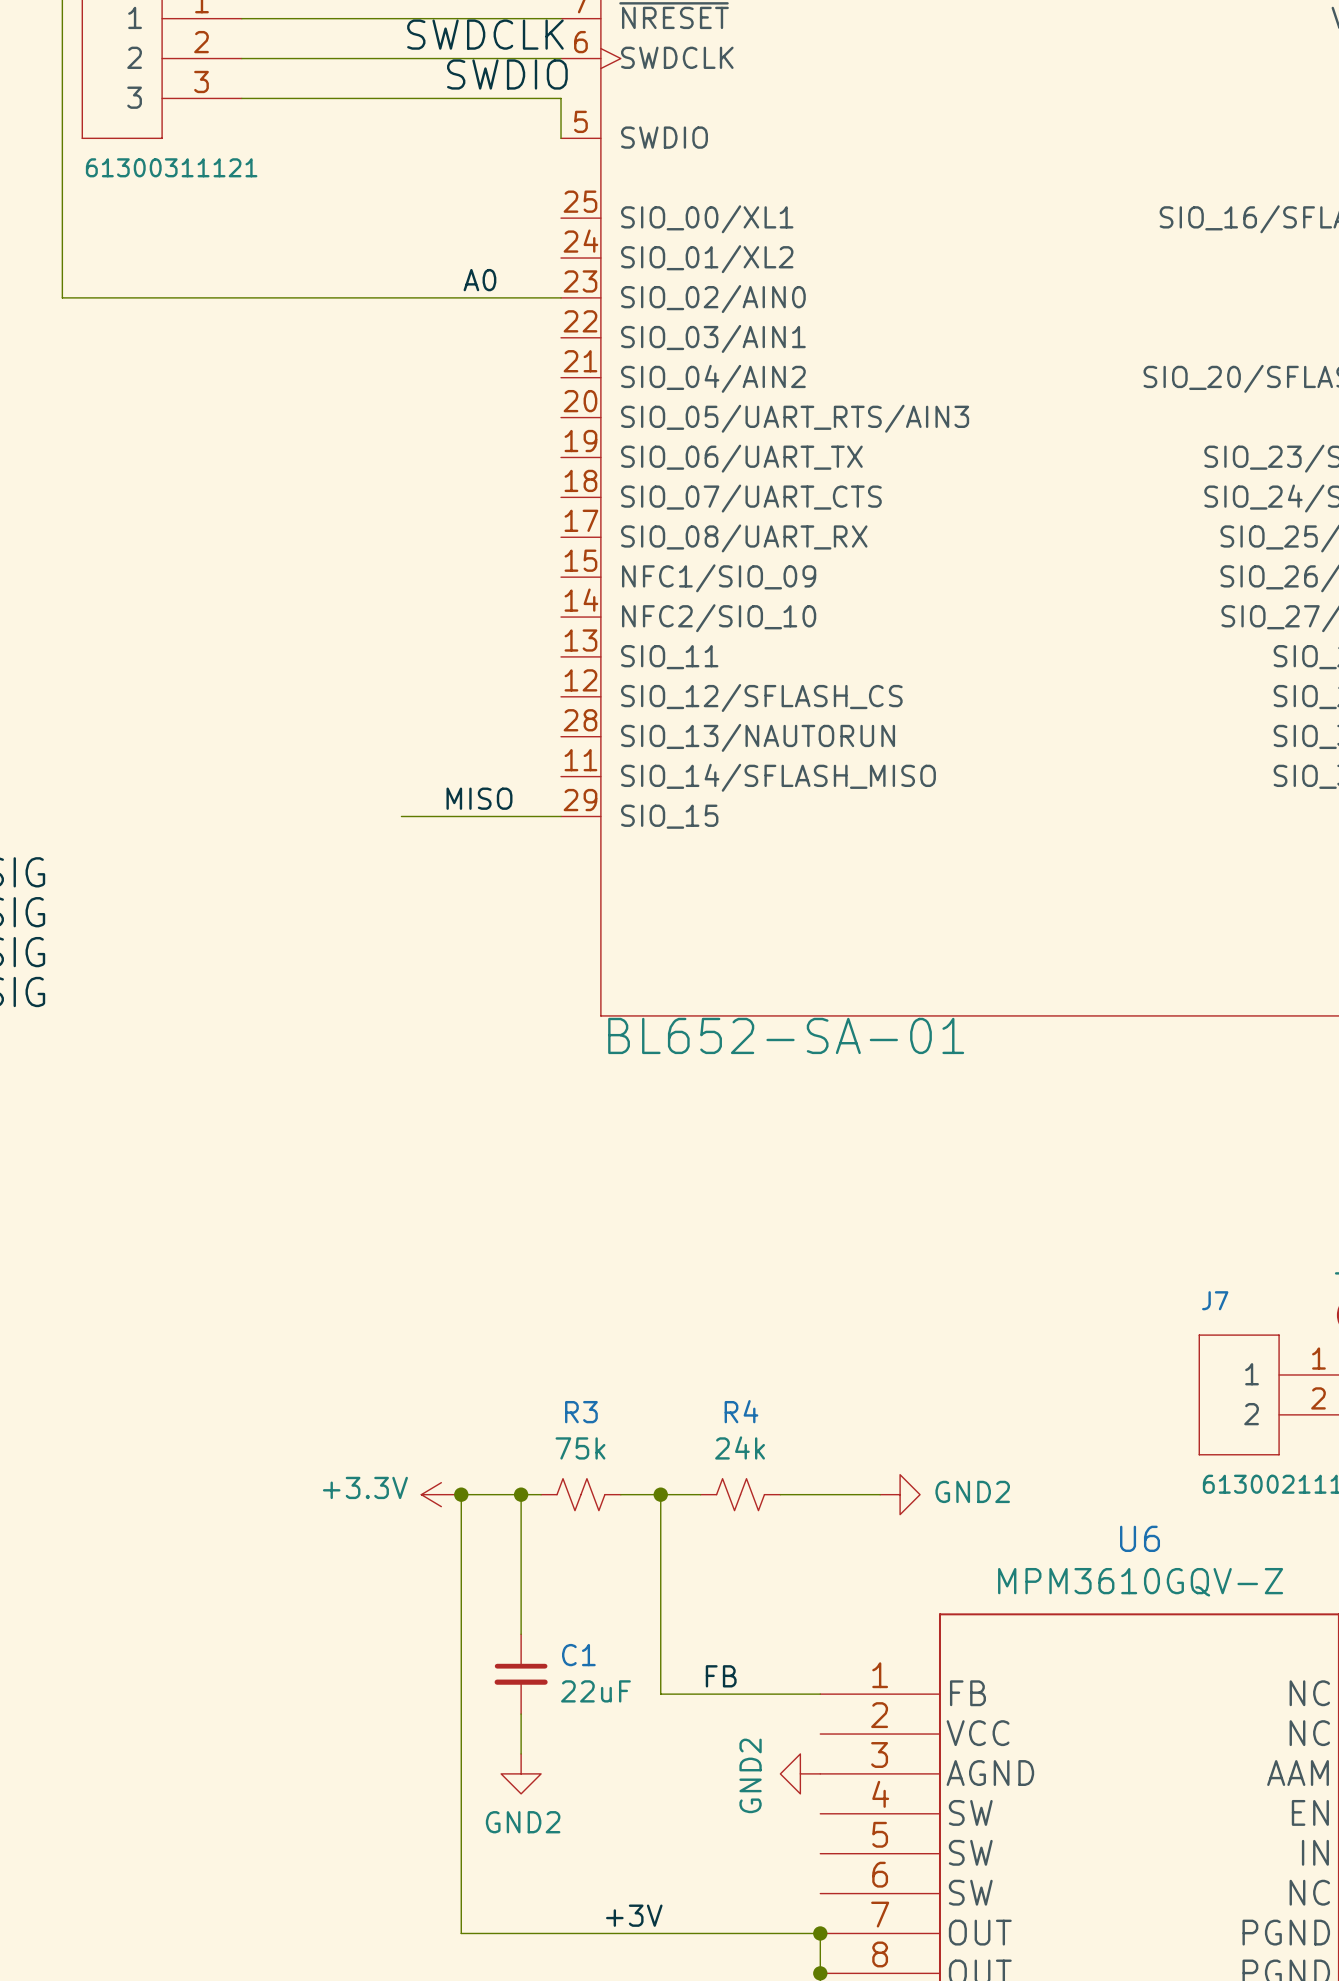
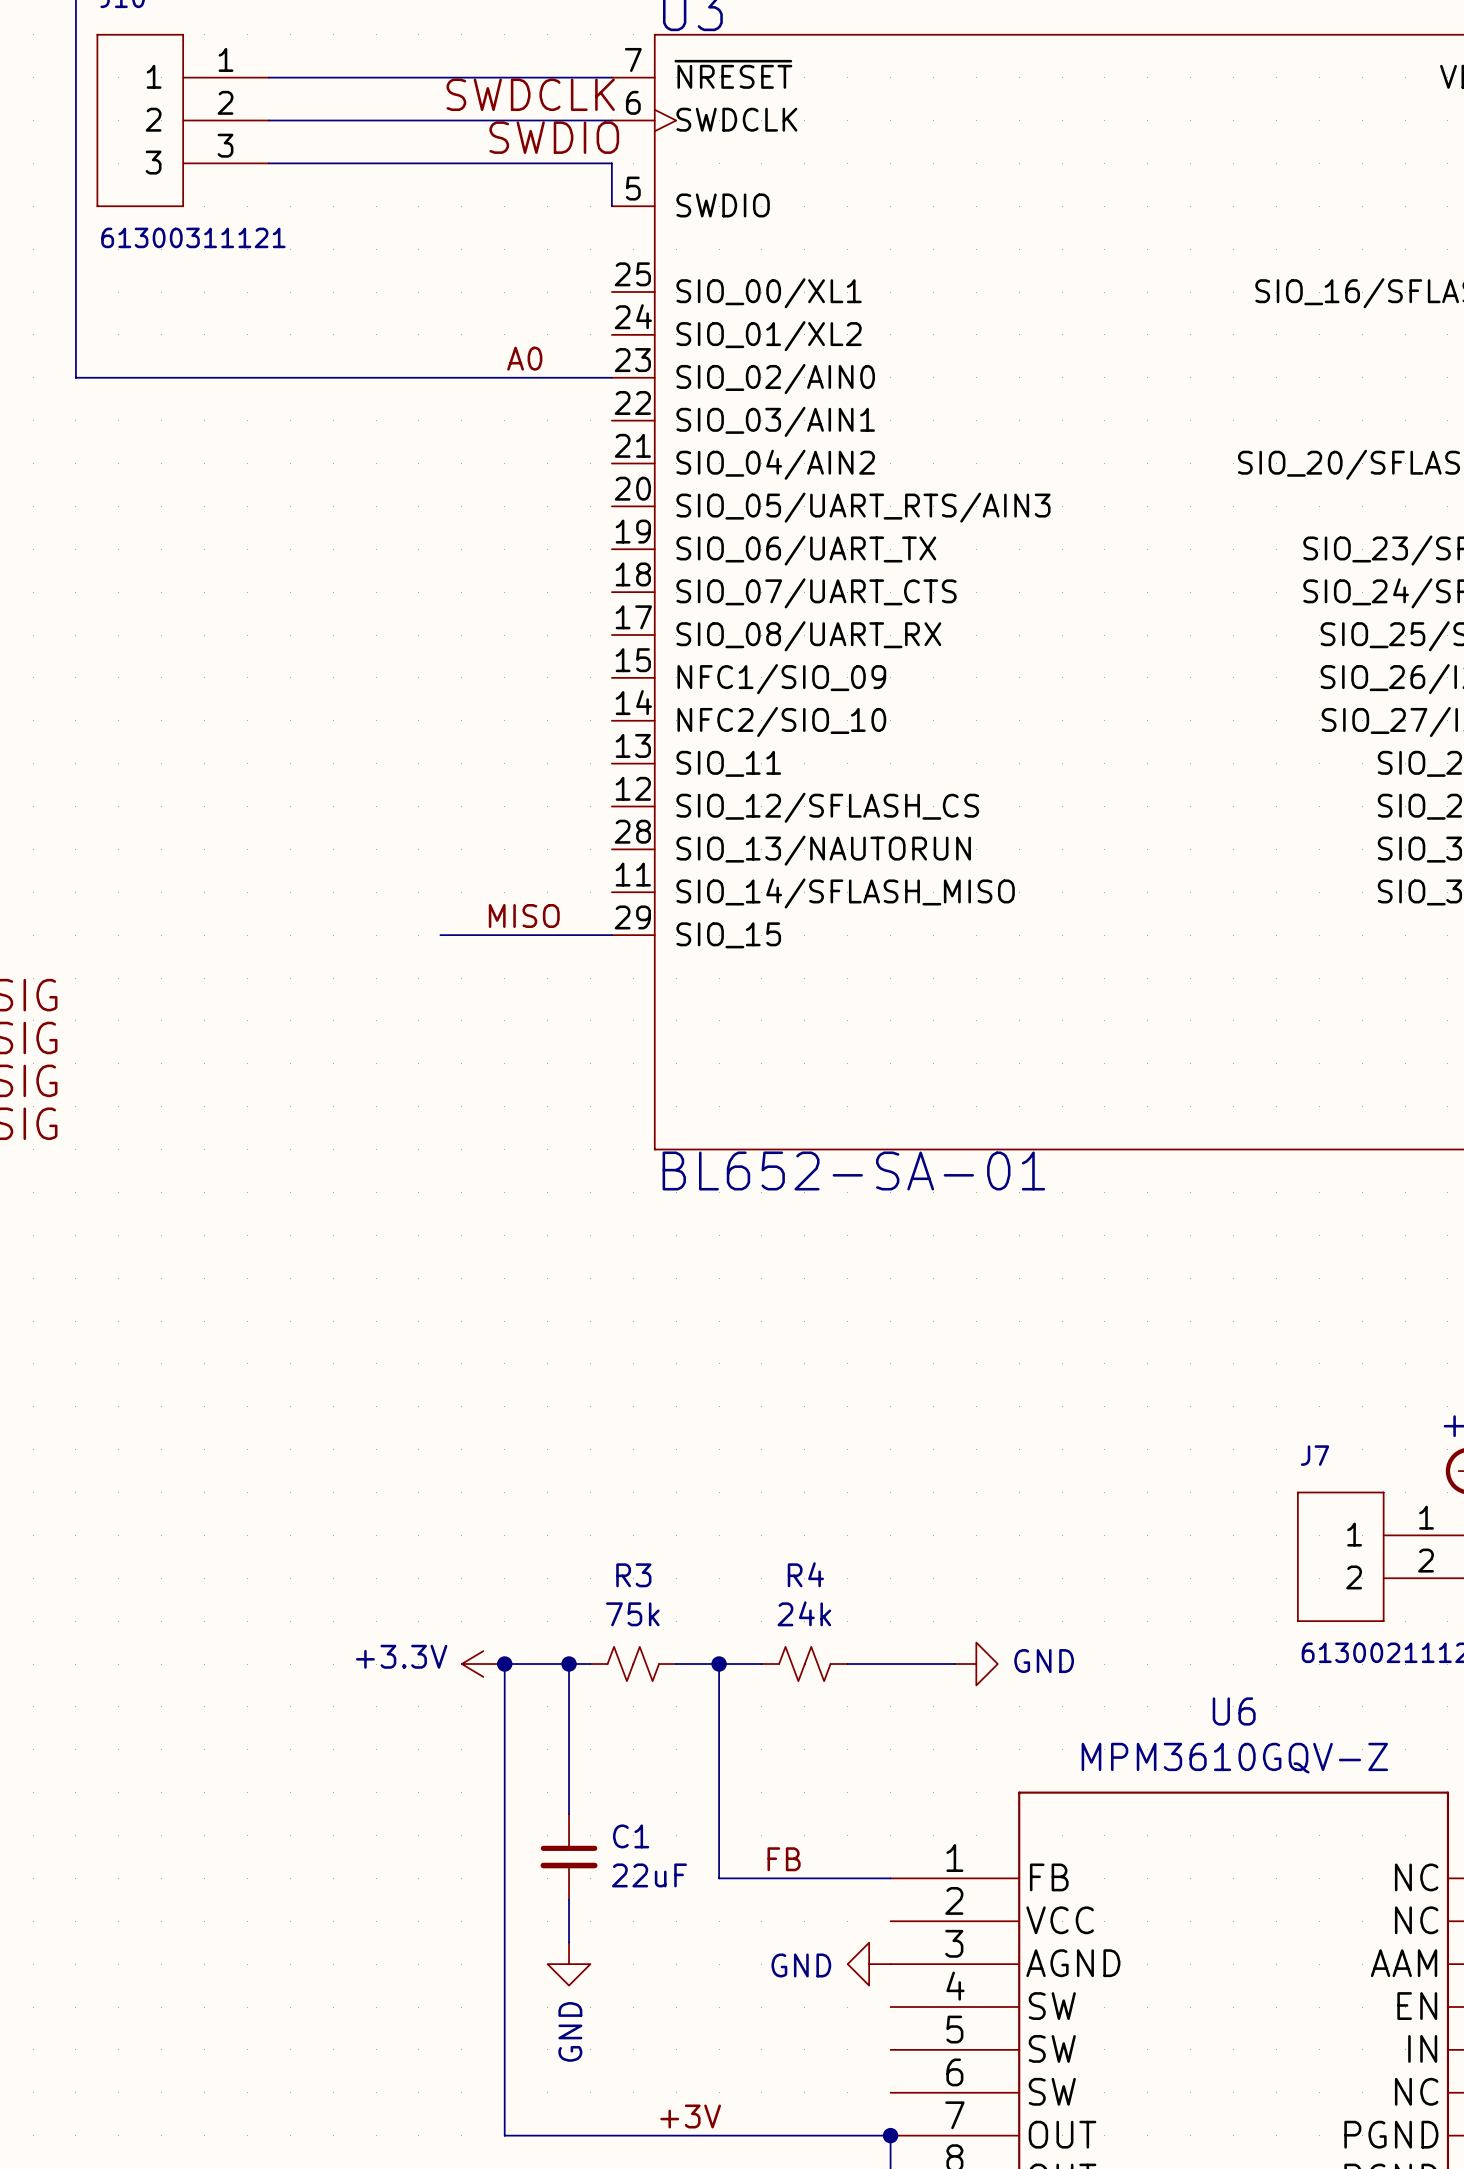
power symbol: GND2 (900, 1494) -> GND (976, 1664)
power symbol: GND2 (521, 1773) -> GND (569, 1964)
power symbol: GND2 (800, 1773) -> GND (869, 1964)

